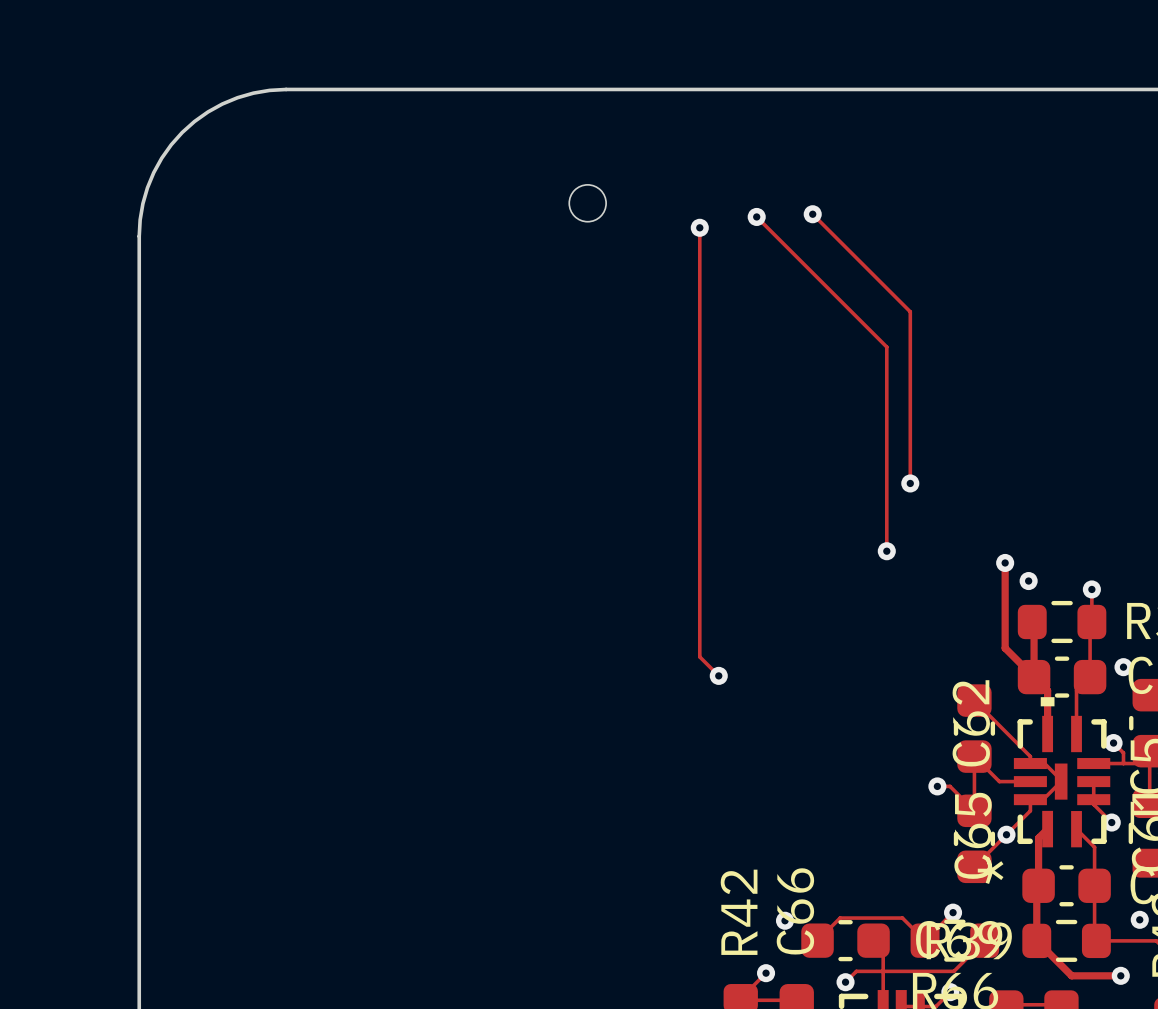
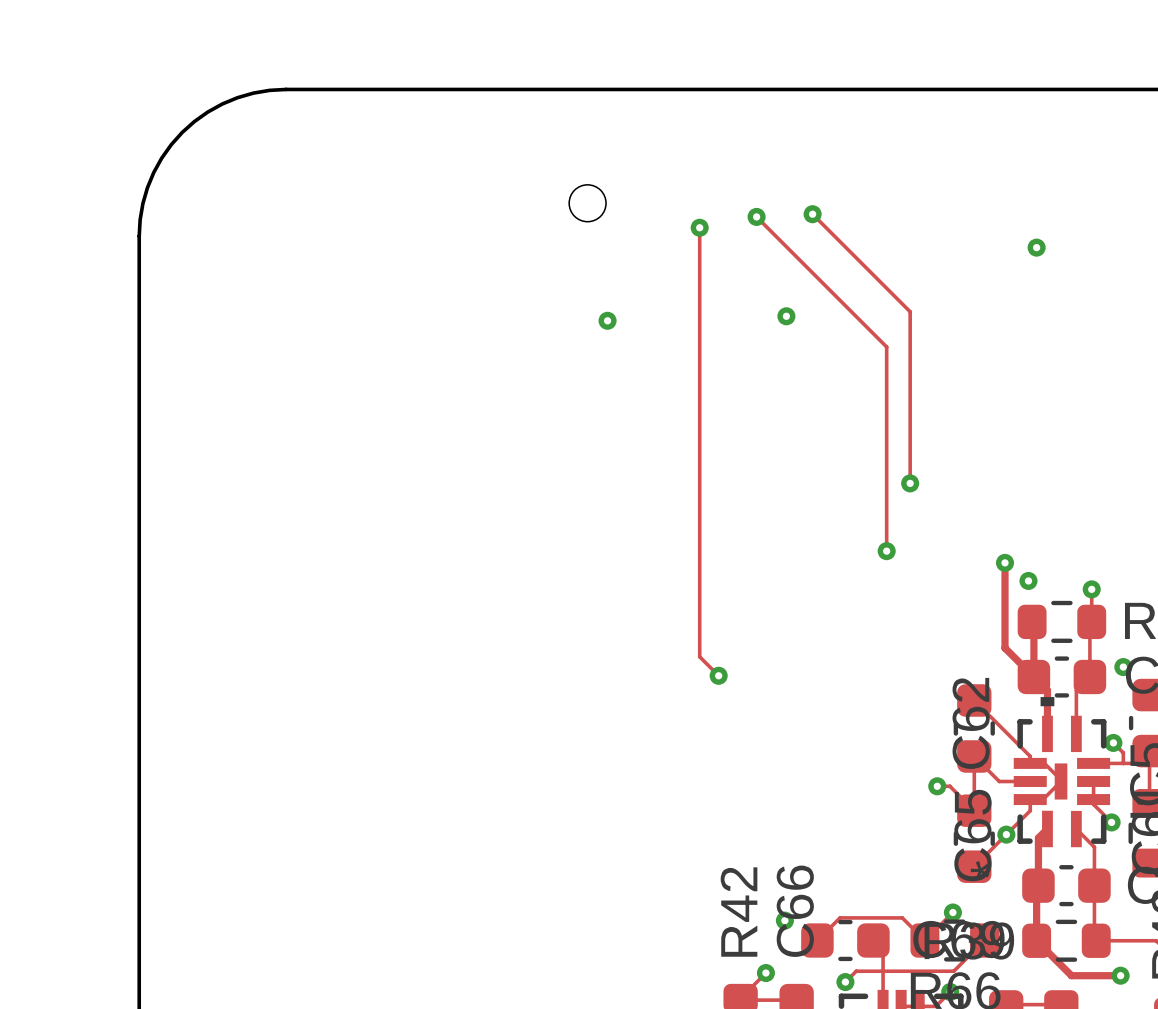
via: none -> (1036, 247)
via: none -> (786, 316)
via: none -> (607, 320)
via: (1139, 919) -> none

